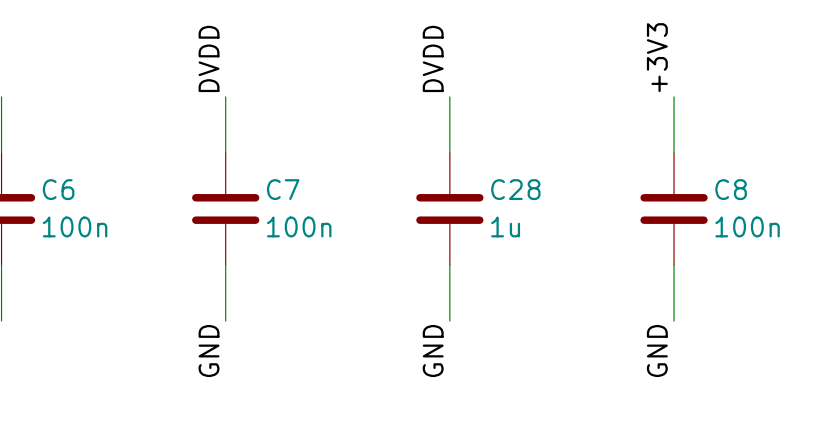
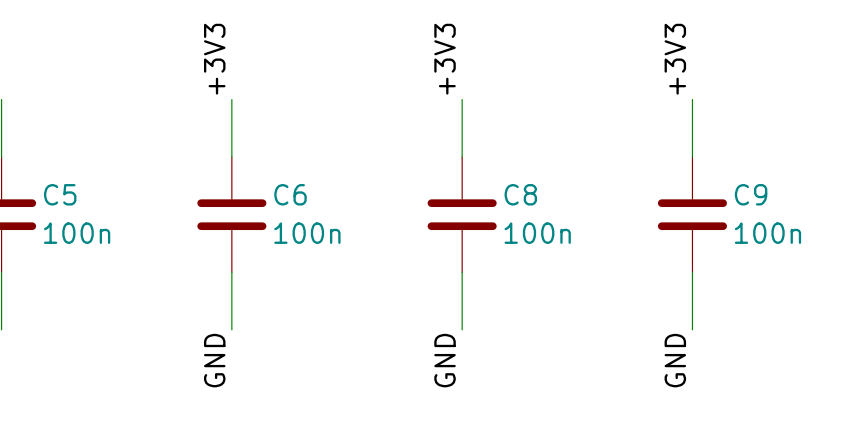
label: DVDD (209, 58) -> +3V3 (214, 59)
label: DVDD (433, 58) -> +3V3 (445, 59)
C6 name: C6 (58, 189) -> C5 (60, 194)
C7 name: C7 (283, 189) -> C6 (290, 194)
C28 name: C28 (515, 189) -> C8 (520, 194)
C8 name: C8 (731, 189) -> C9 (751, 194)
C28 value: 1u (505, 226) -> 100n (537, 233)

